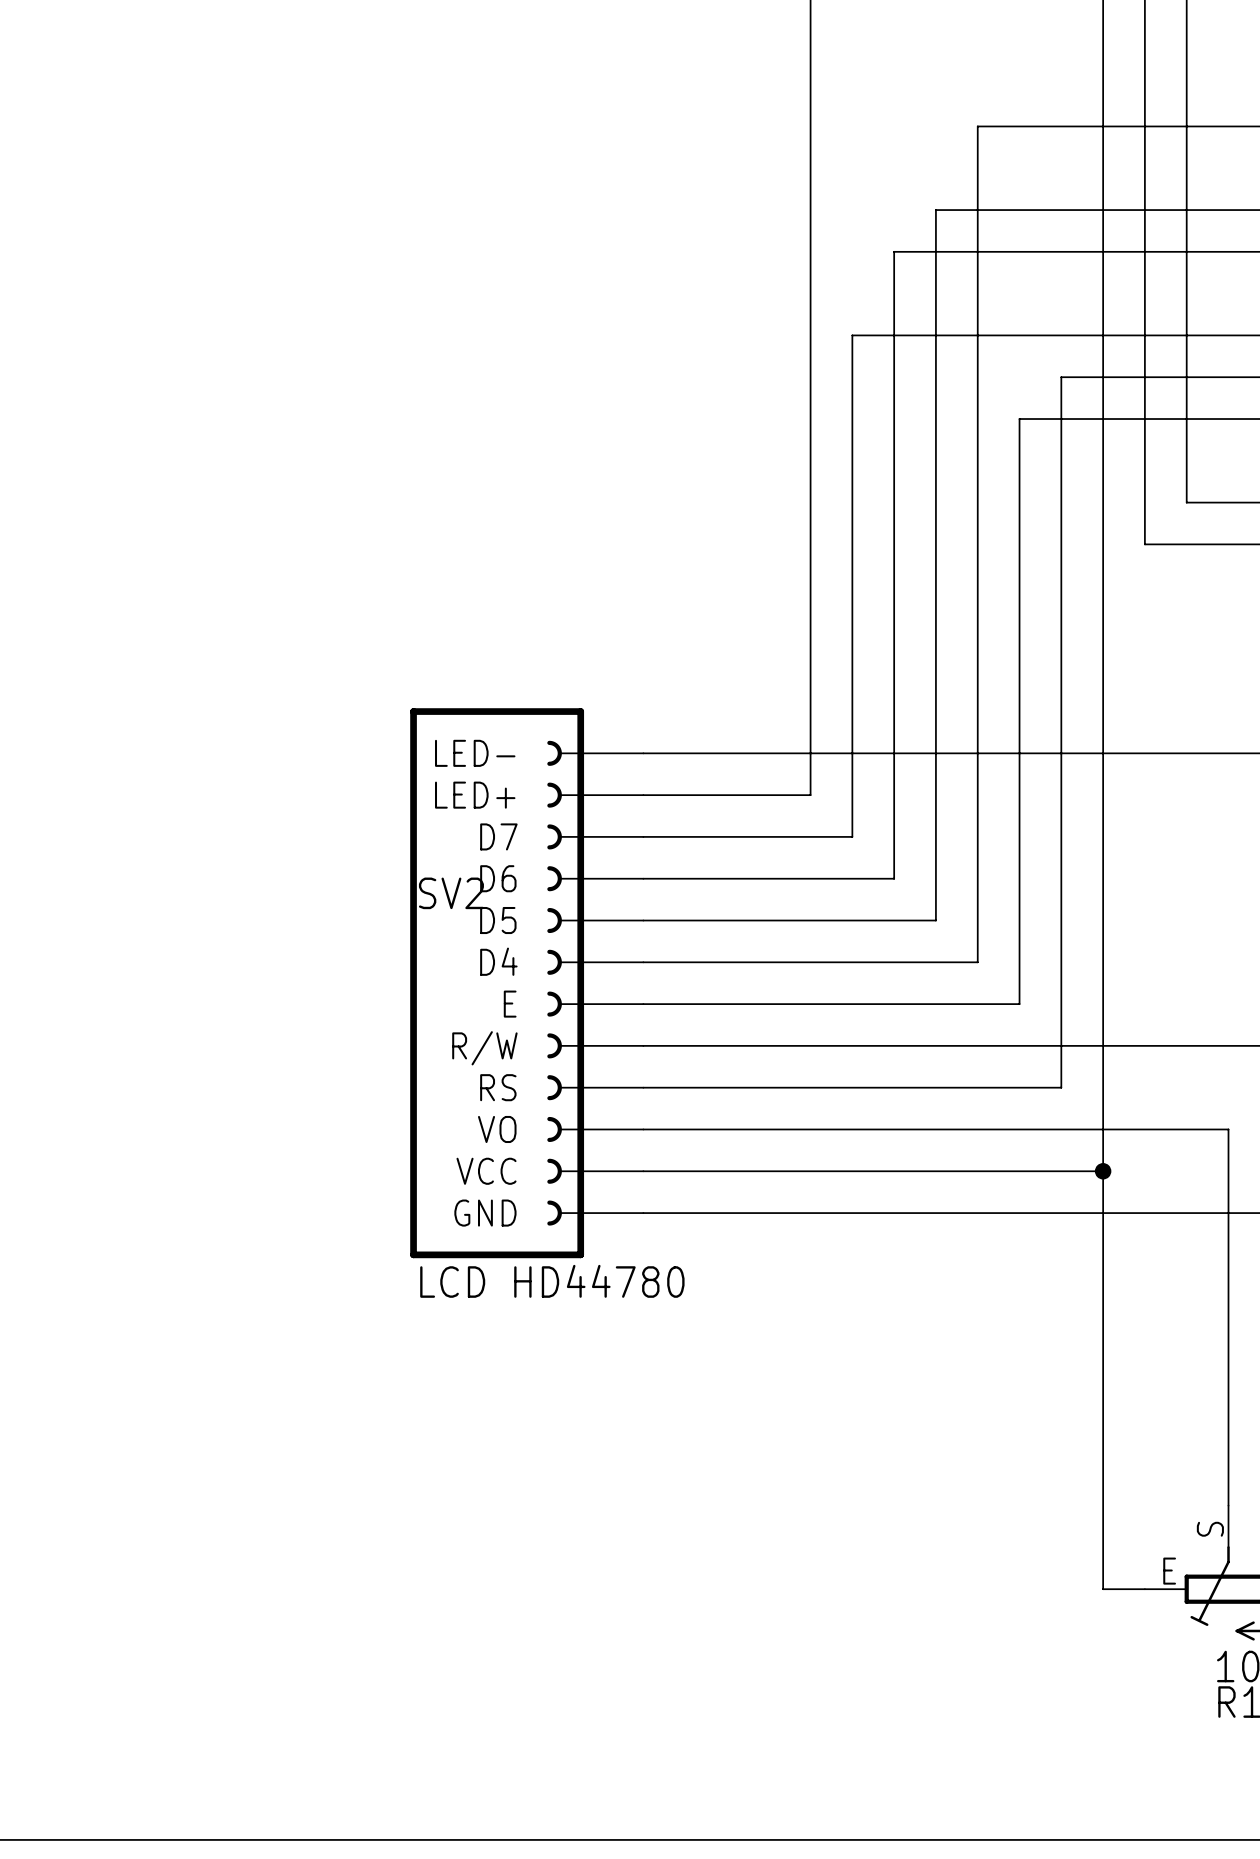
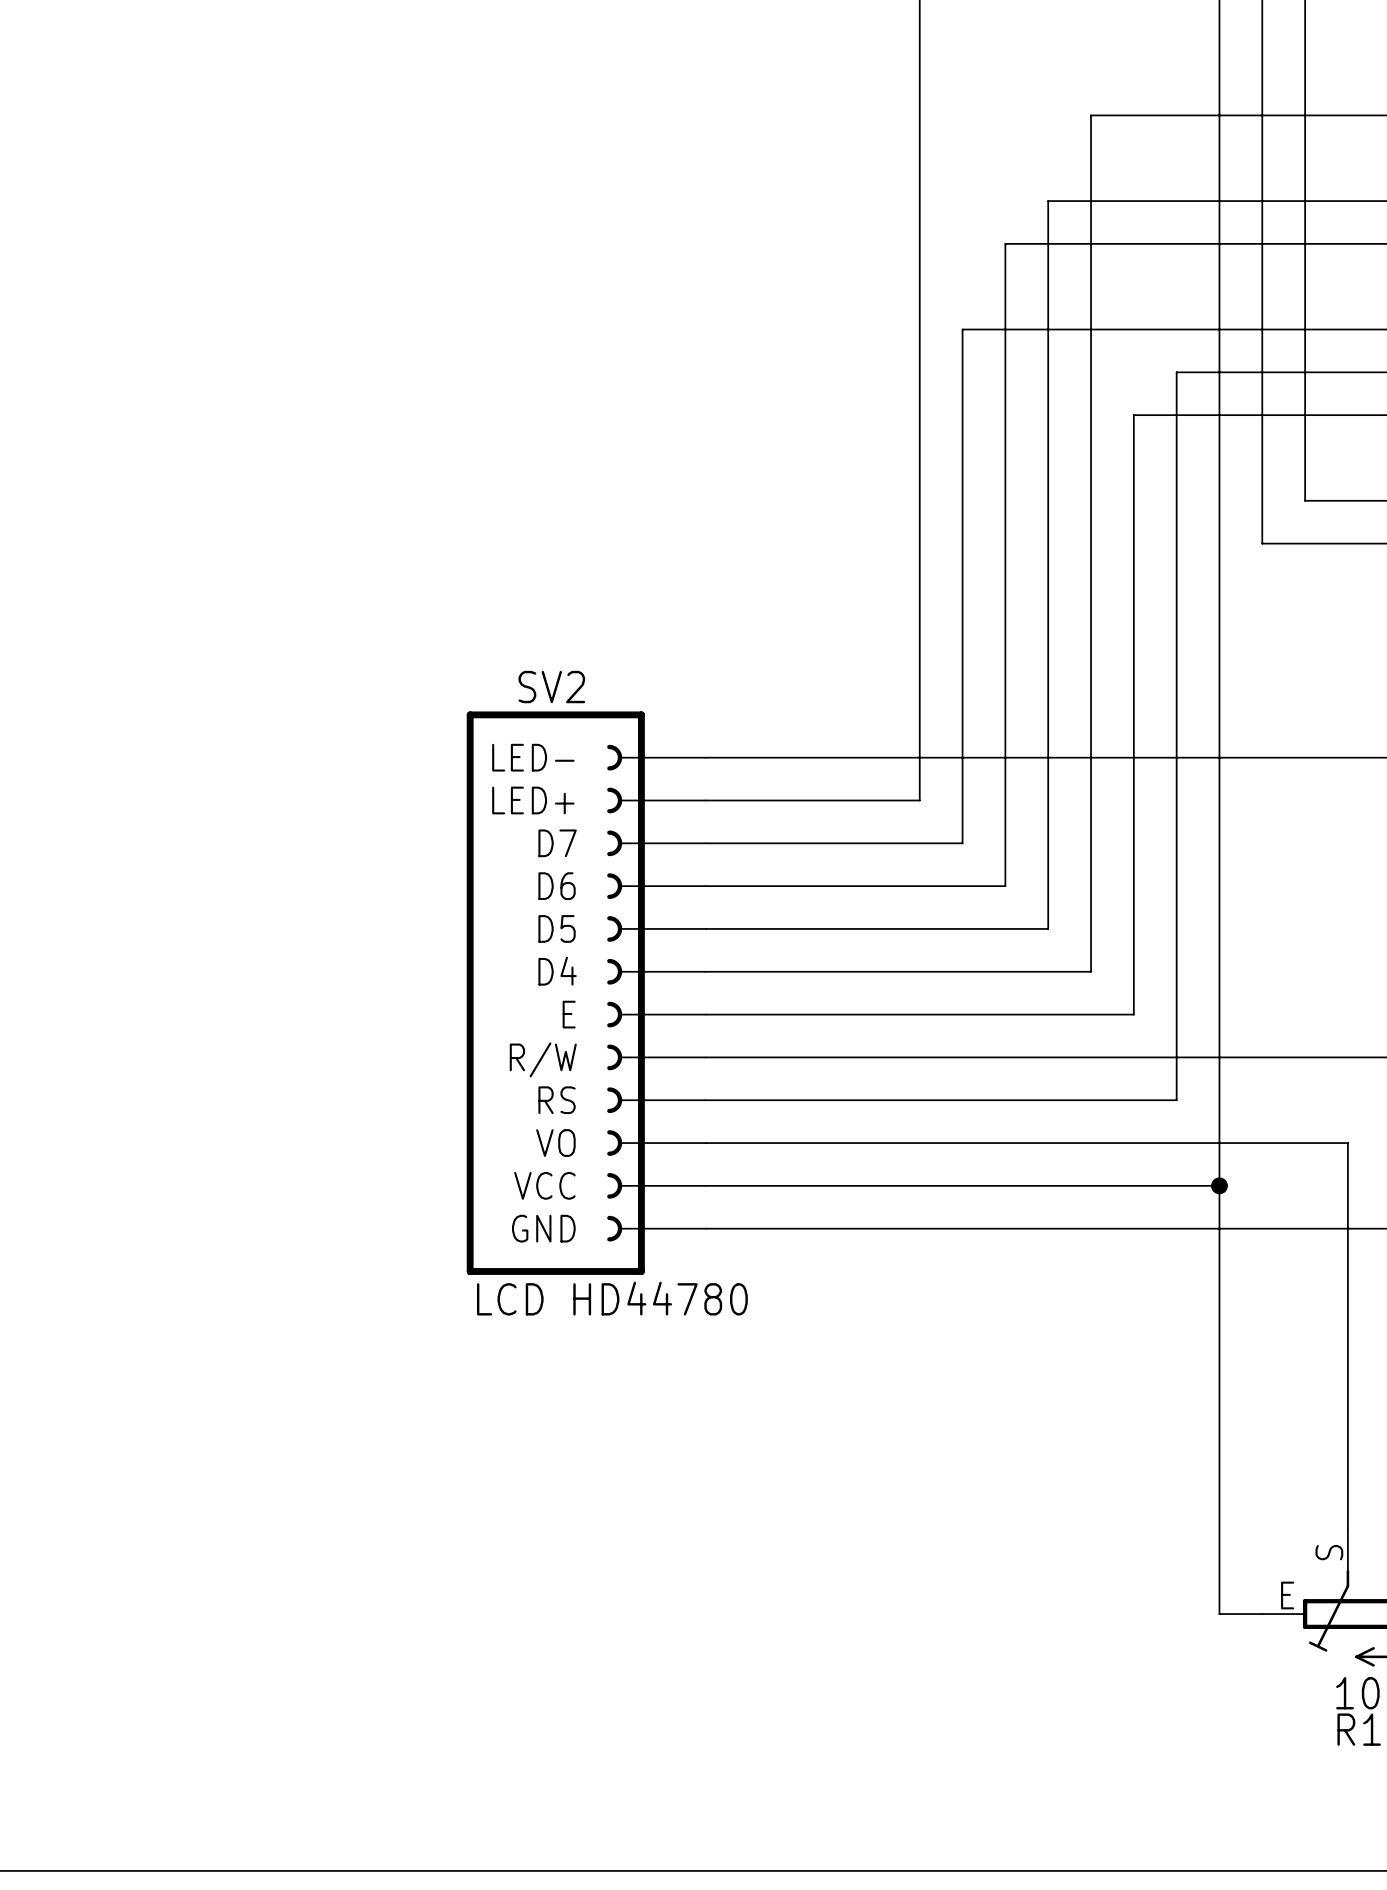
SV2 name position: SV2 (451, 893) -> SV2 (551, 687)
SV2 position: (526, 983) -> (586, 993)

